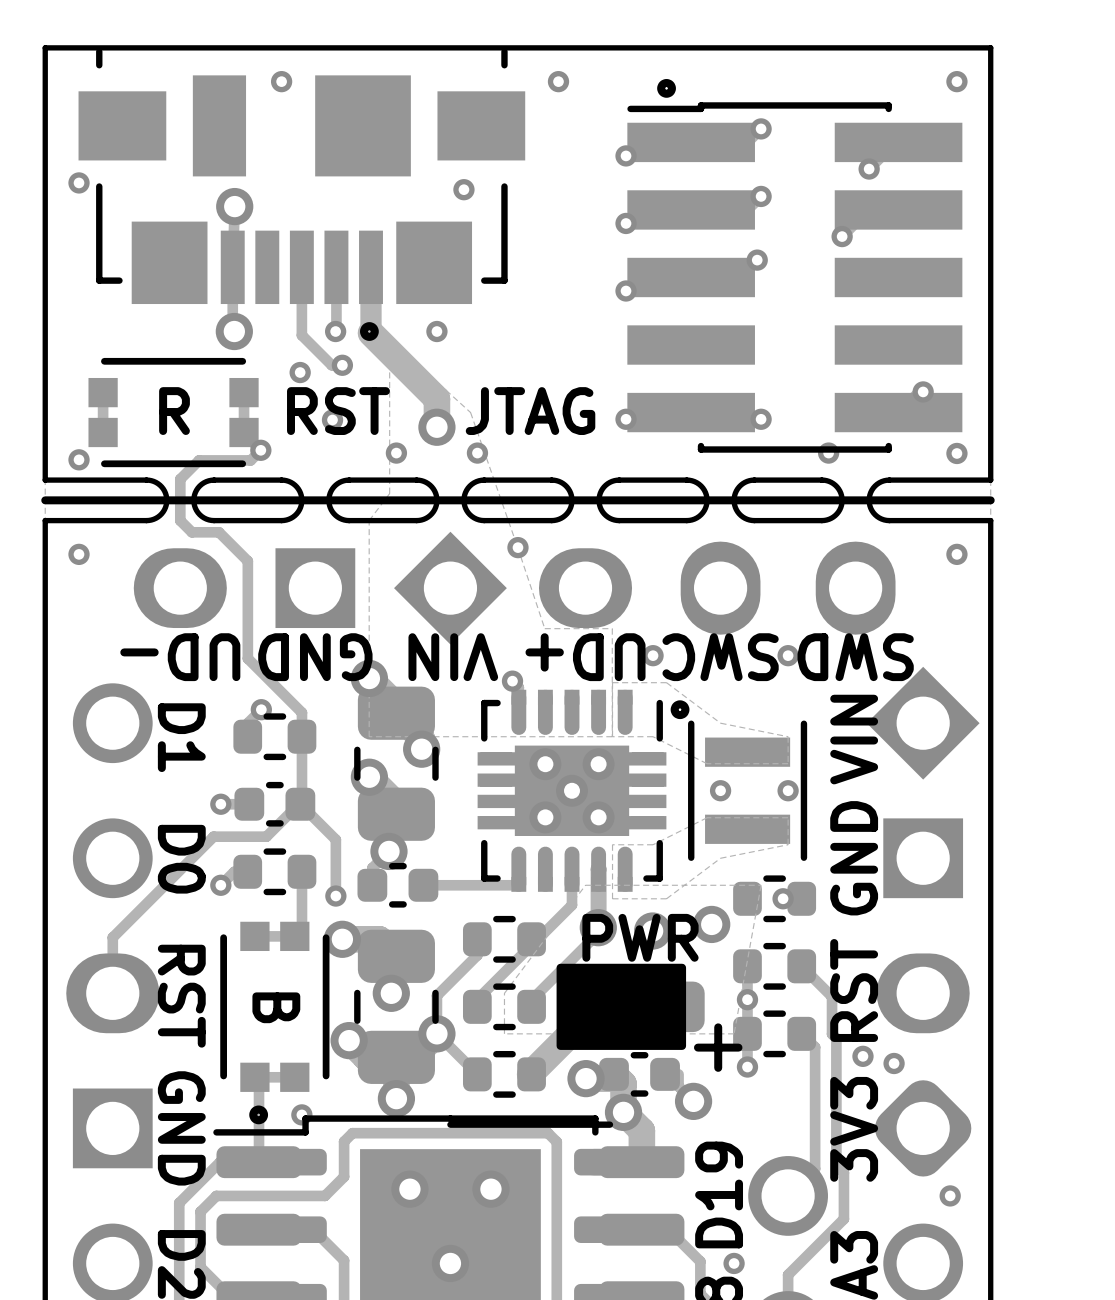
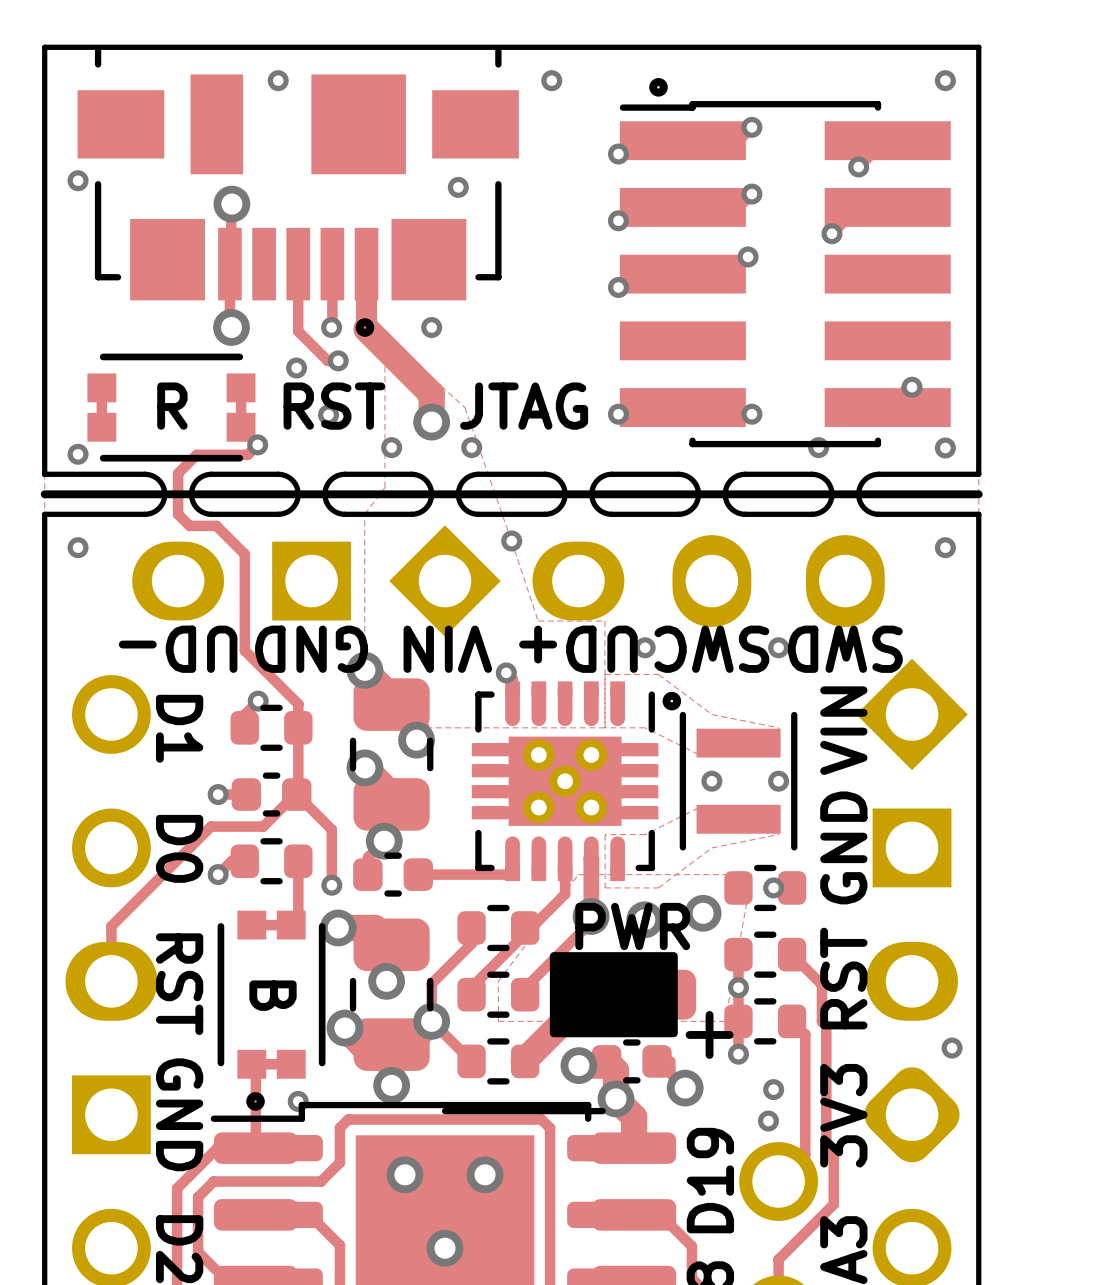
via: (862, 1056) -> none
via: none -> (952, 1048)
via: (894, 1063) -> none
via: none -> (773, 1089)
via: none -> (768, 1121)
via: (950, 1195) -> none
via: (734, 1263) -> none

